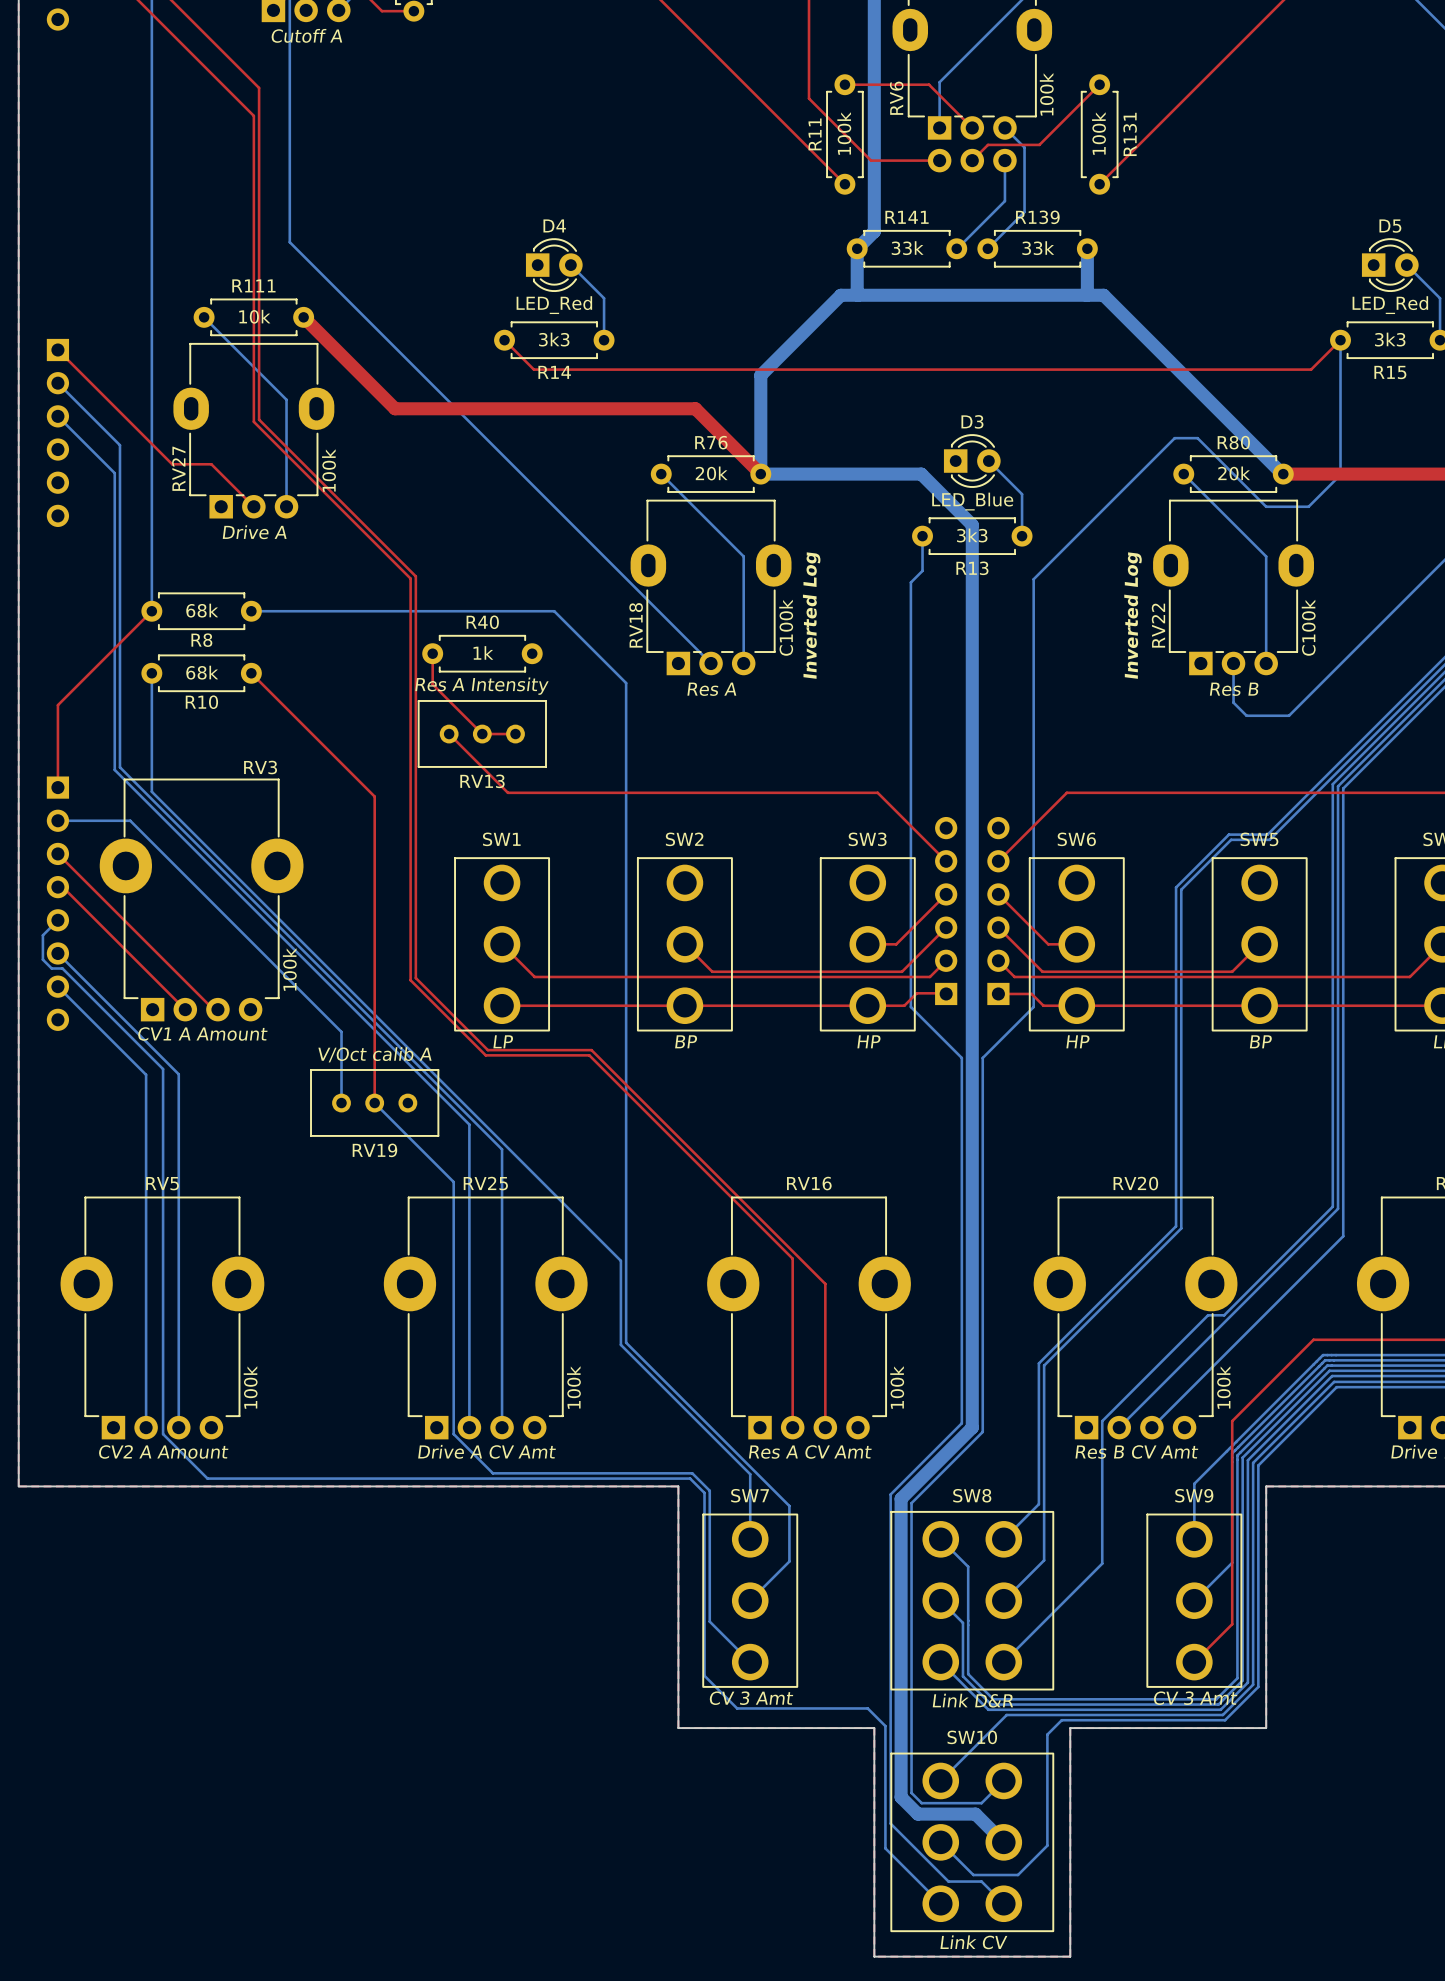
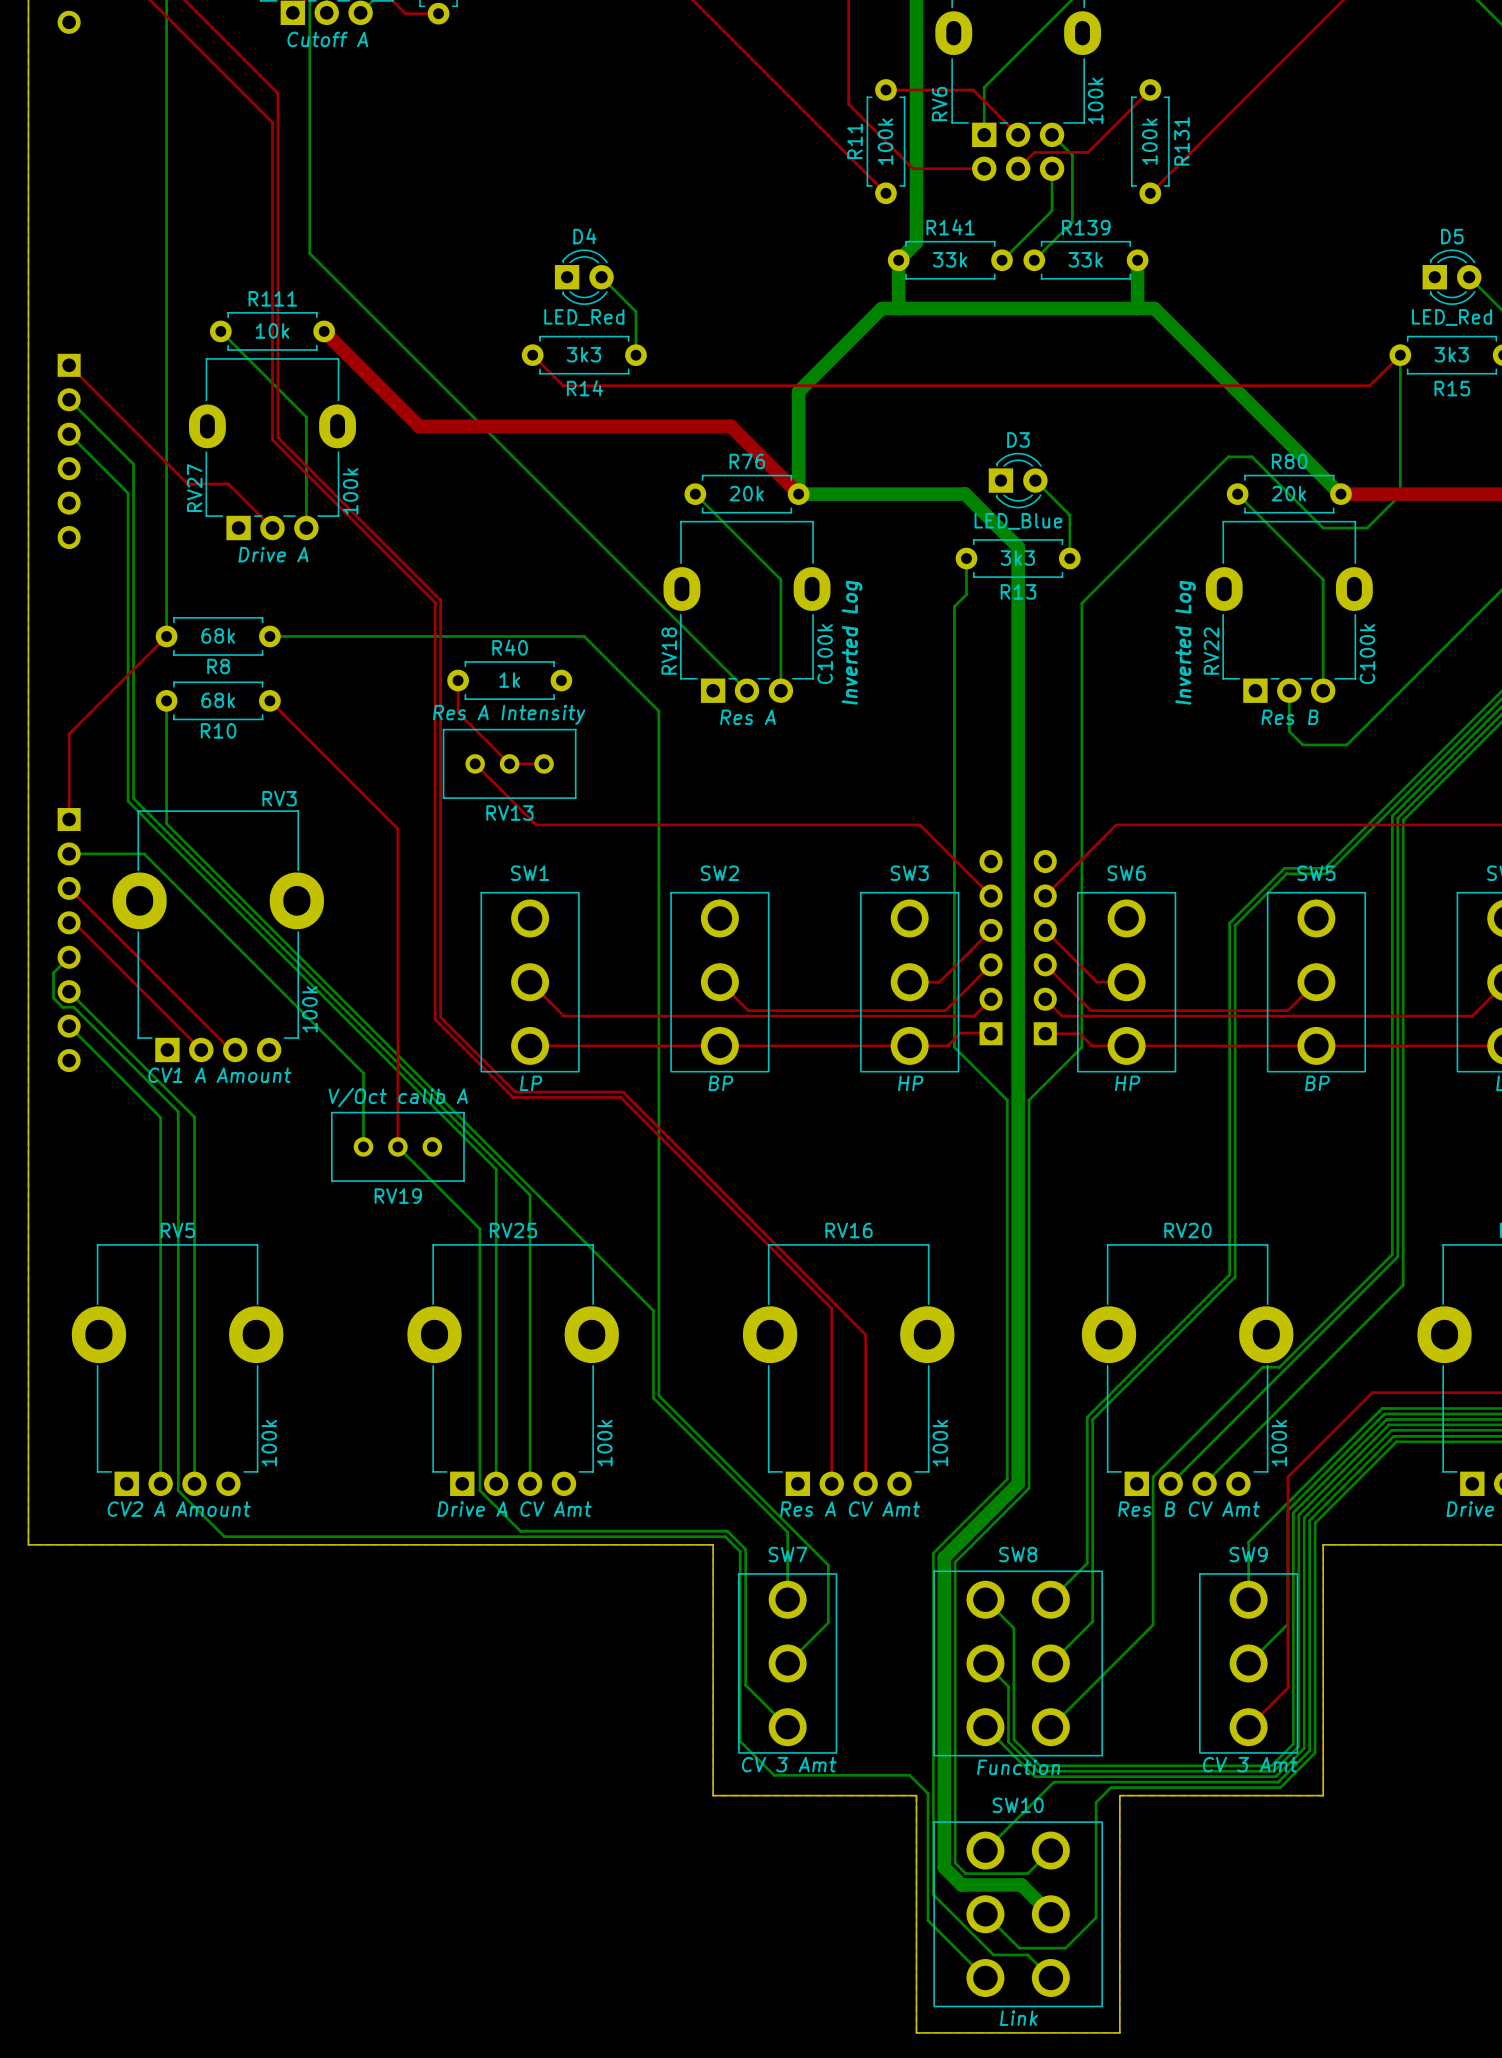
SW8 text: Link D&R (972, 1700) -> Function (1018, 1767)
SW10 text: Link CV (973, 1942) -> Link (1019, 2018)

